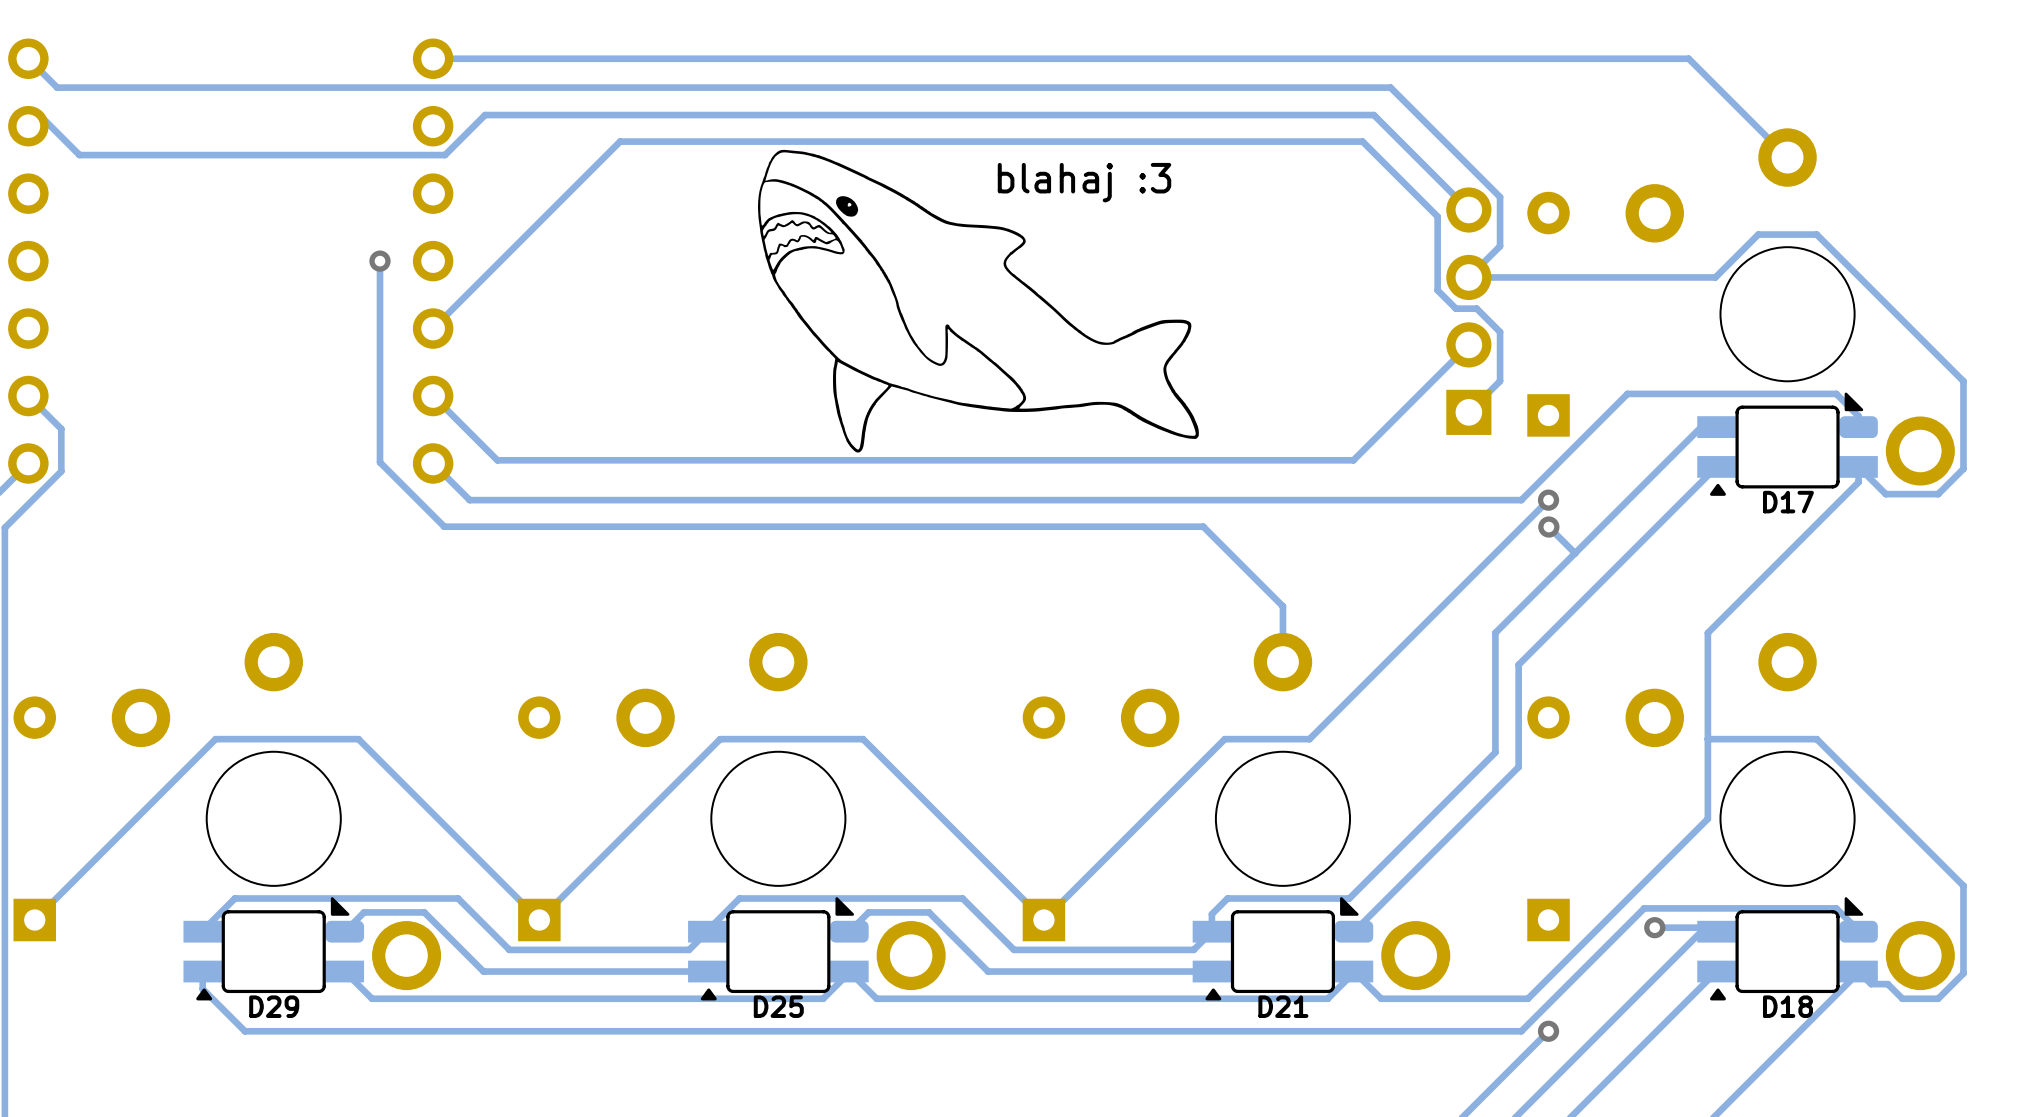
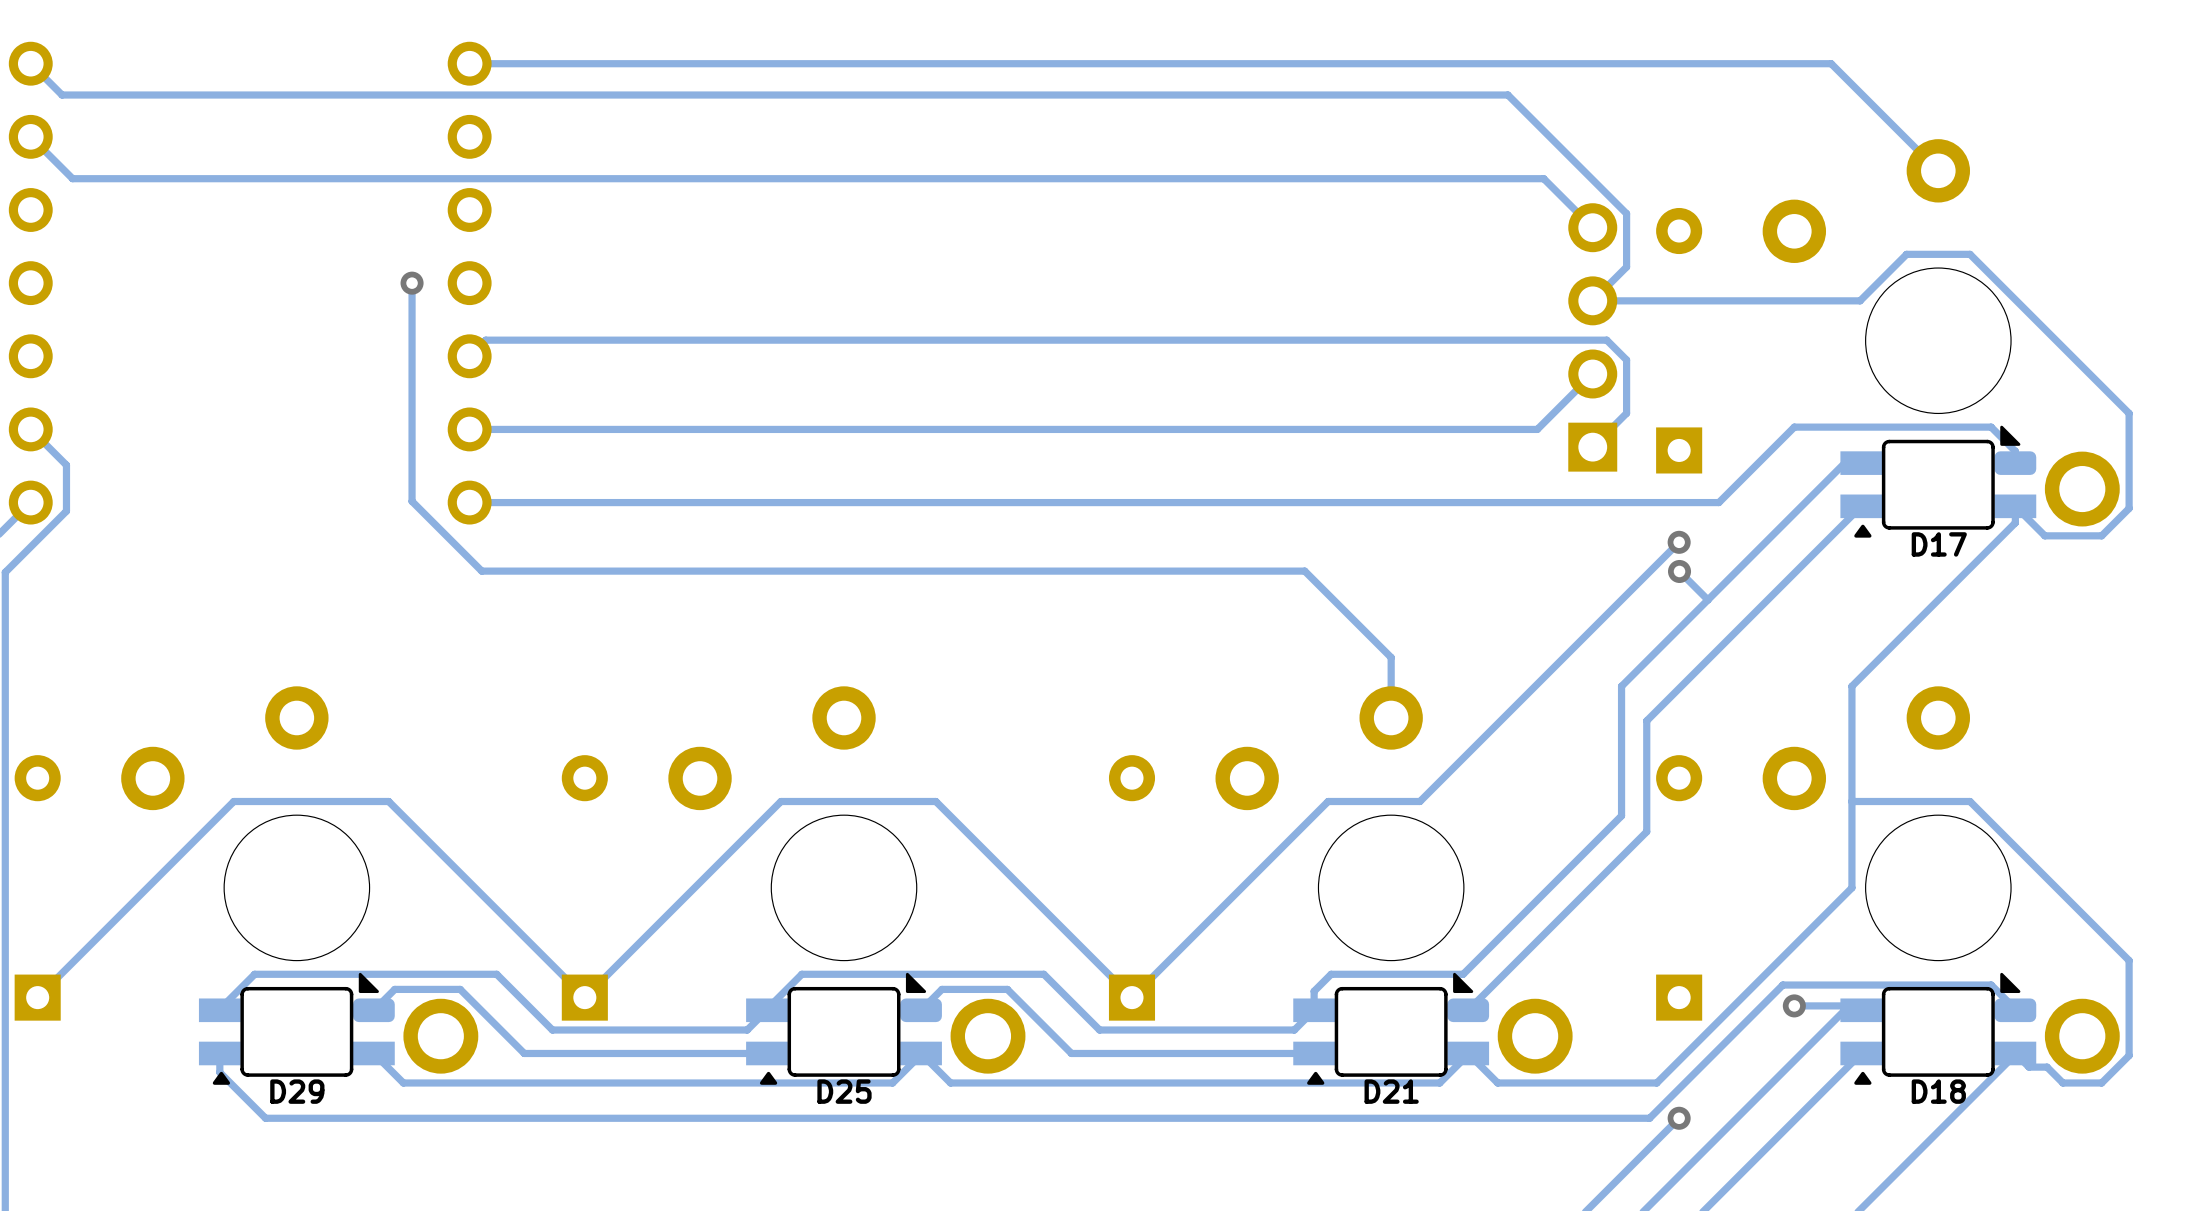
track: (28, 126) (39, 115) (79, 155) (445, 155) (485, 115) (1373, 115) (1423, 164) -> (30, 136) (72, 178) (1543, 178)
drawing: [758, 149, 1199, 453] -> none
text: blahaj :3 (1084, 182) -> none
track: (1481, 313) (1476, 308) (1455, 308) (1437, 290) (1437, 216) (1362, 141) (620, 141) (447, 313) -> (1606, 340) (485, 340)
track: (1654, 393) (1627, 393) (1521, 500) (469, 500) (433, 463) -> (1794, 427) (1718, 502) (469, 502)
track: (1417, 396) (1353, 460) (497, 460) (433, 396) -> (1537, 429) (469, 429)

